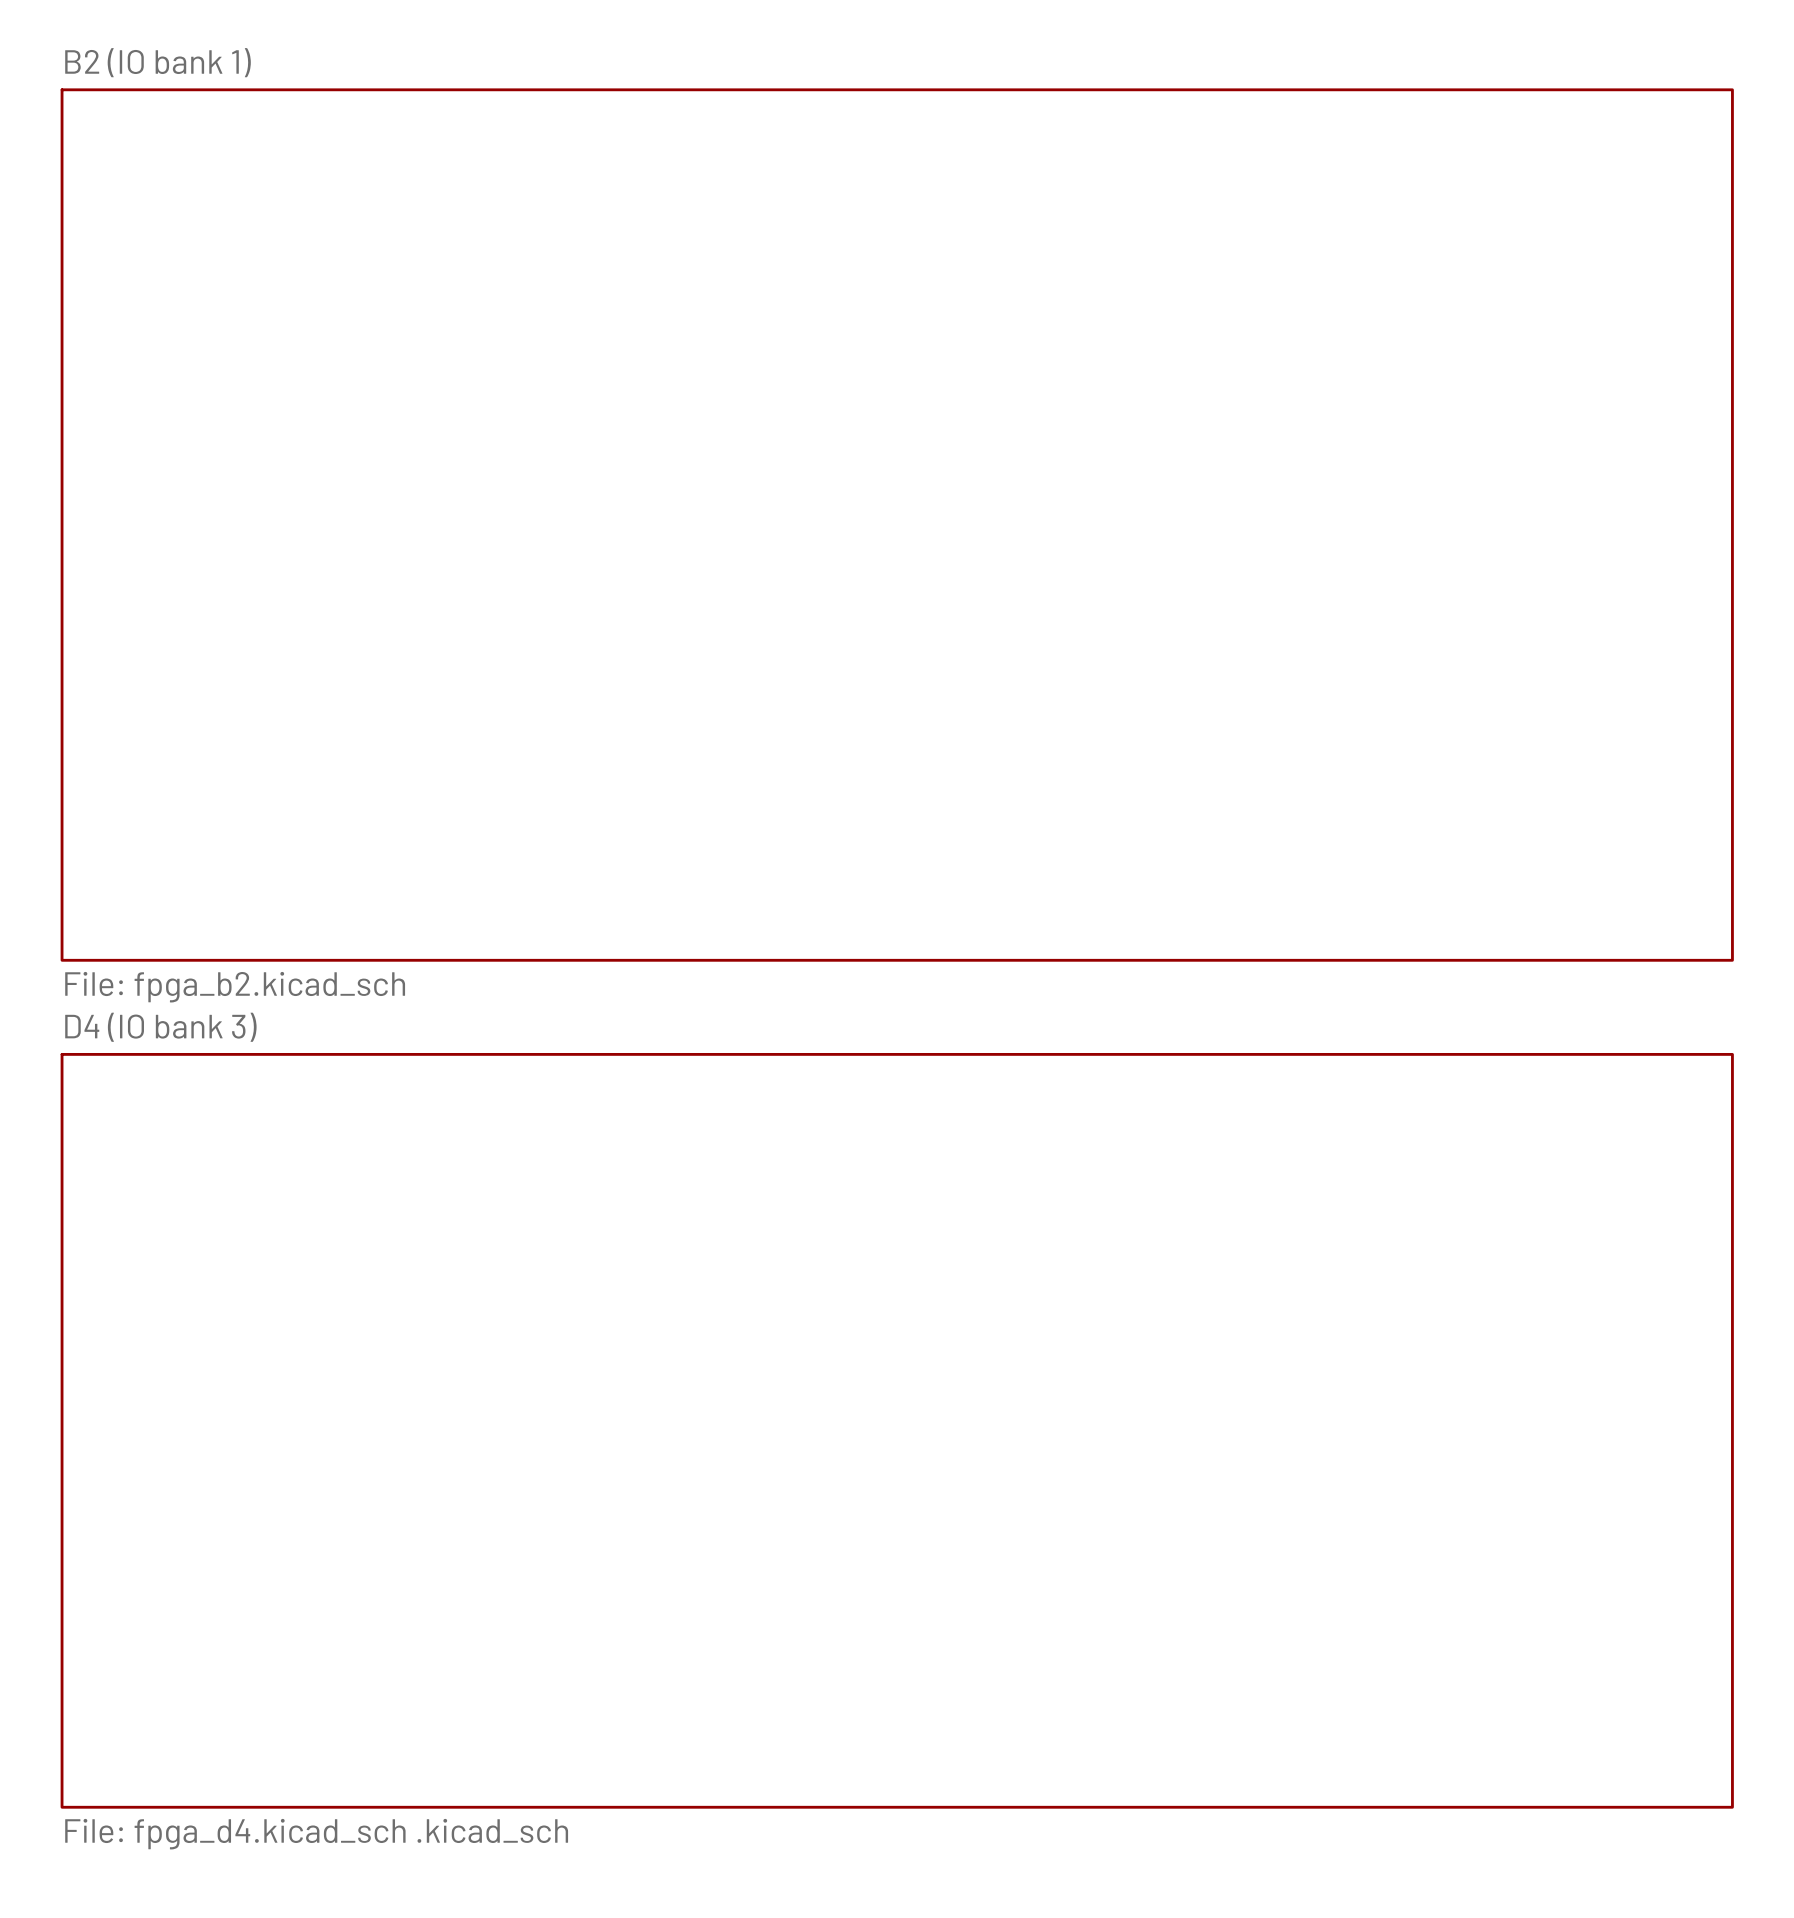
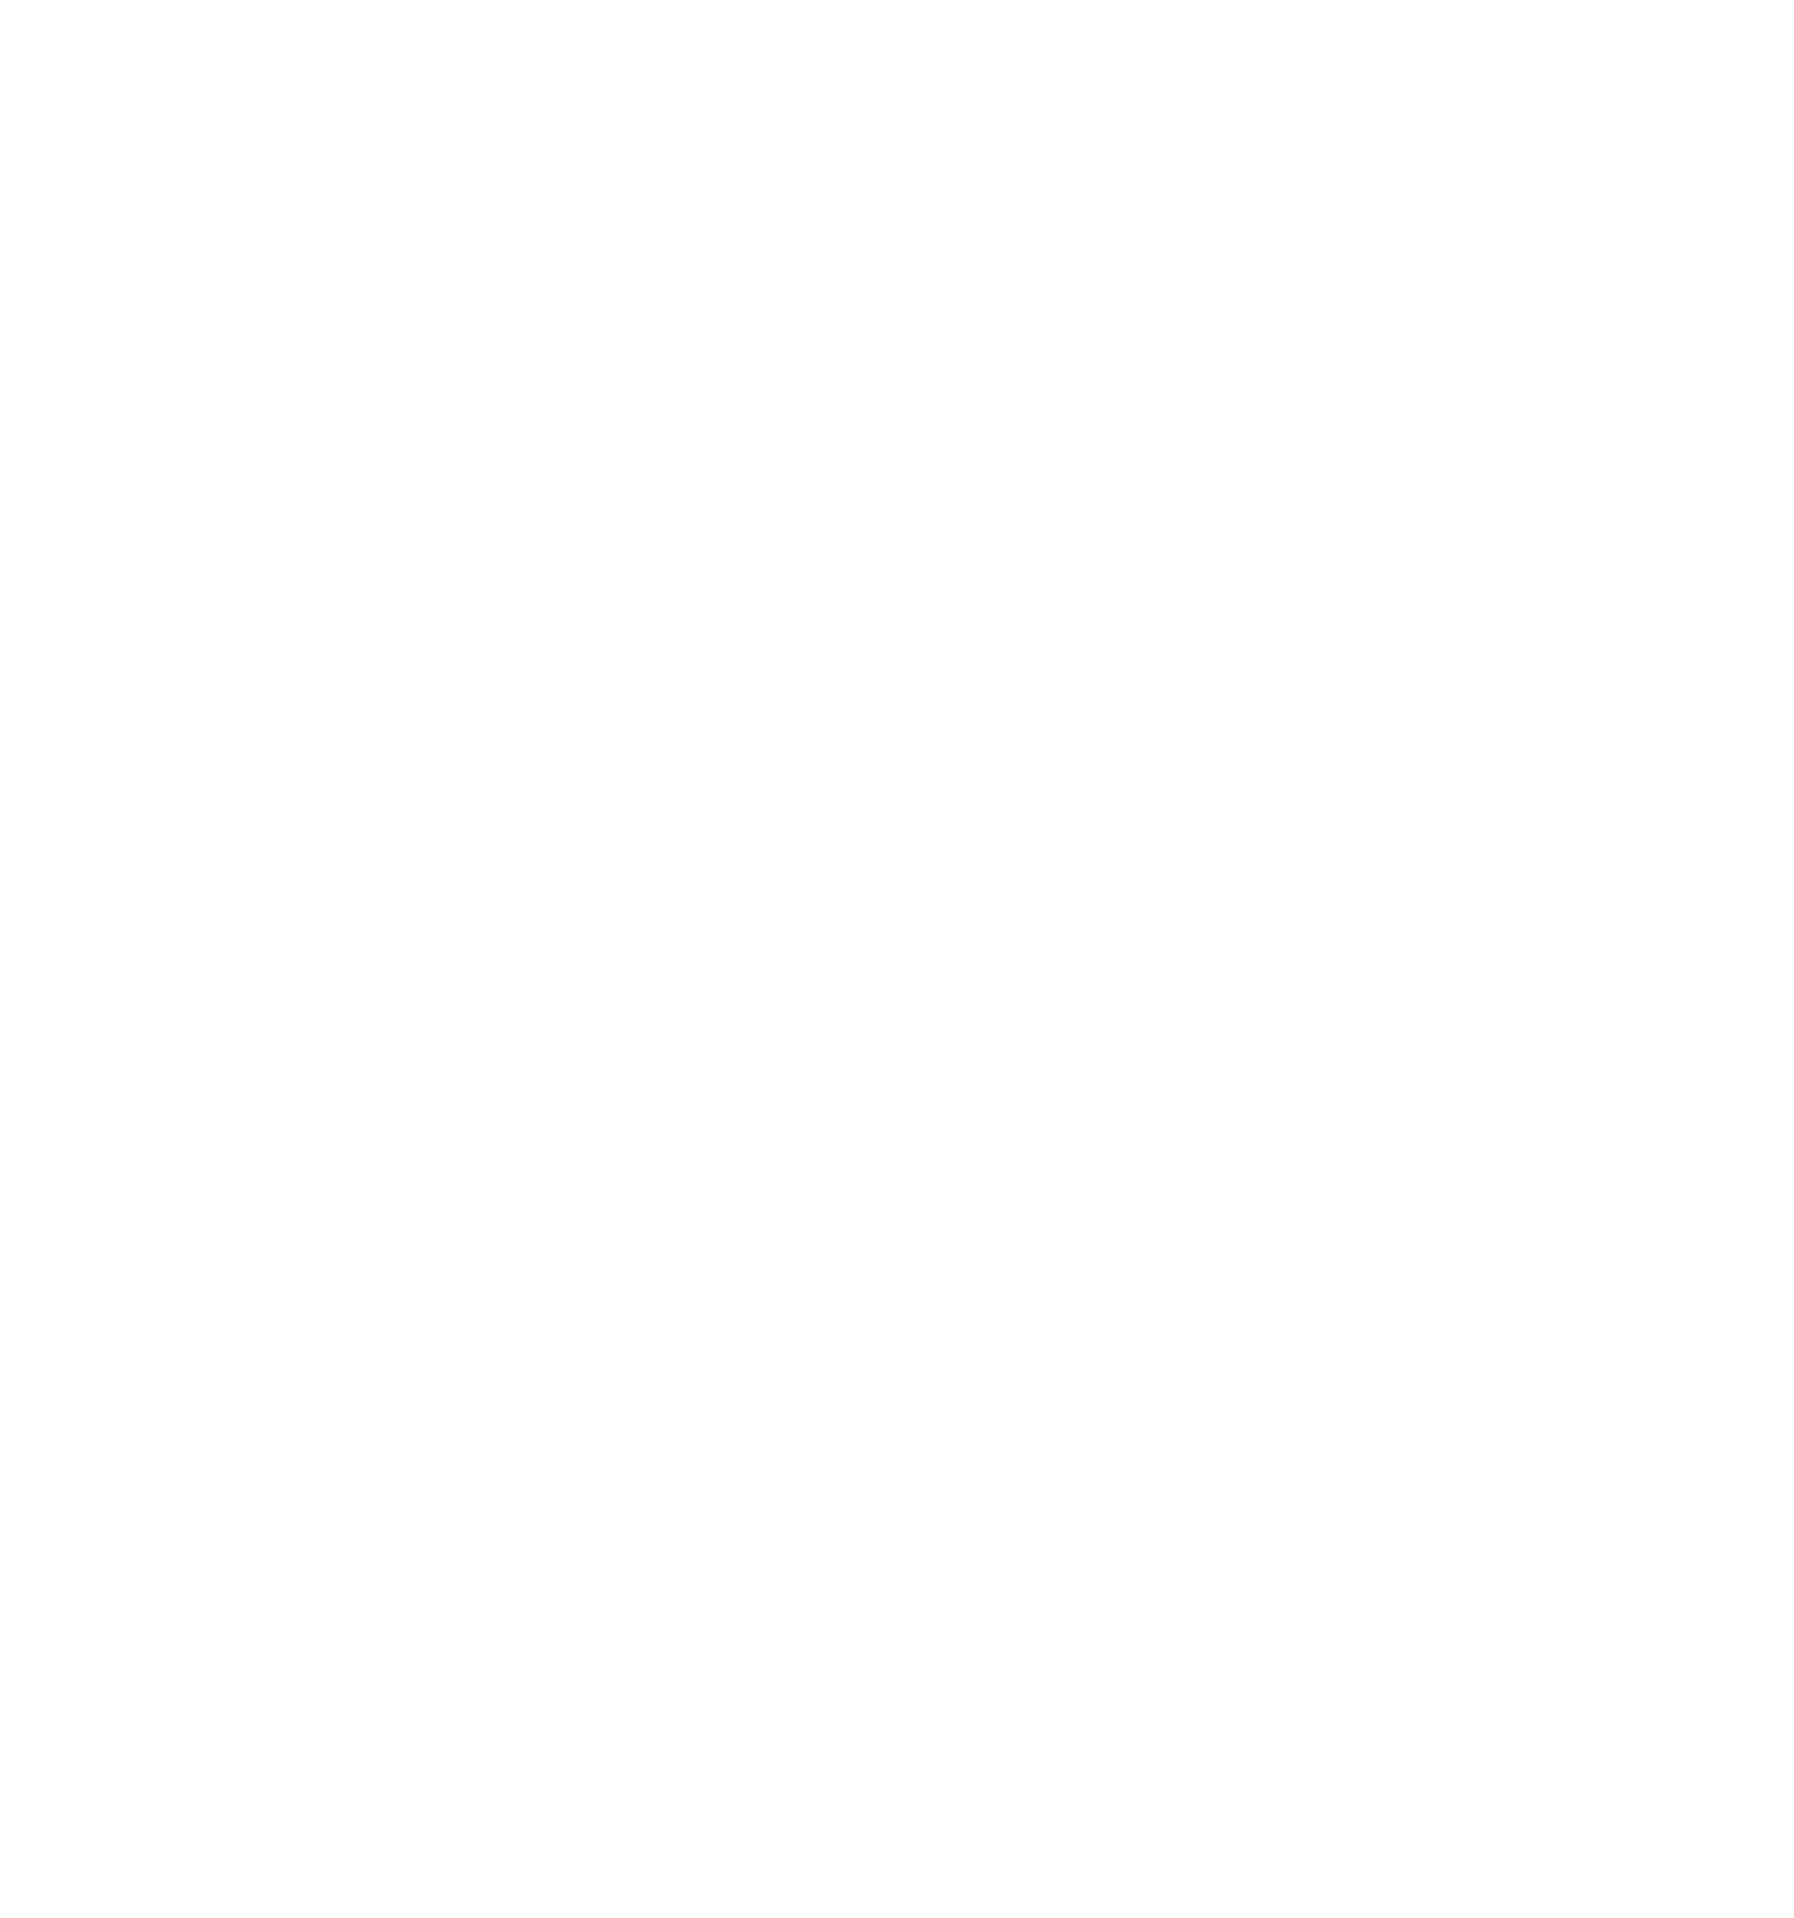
sheet B2 (IO bank 1): File: fpga_b2.kicad_sch (897, 525) -> none
sheet D4 (IO bank 3): File: fpga_d4.kicad_sch .kicad_sch (897, 1430) -> none

